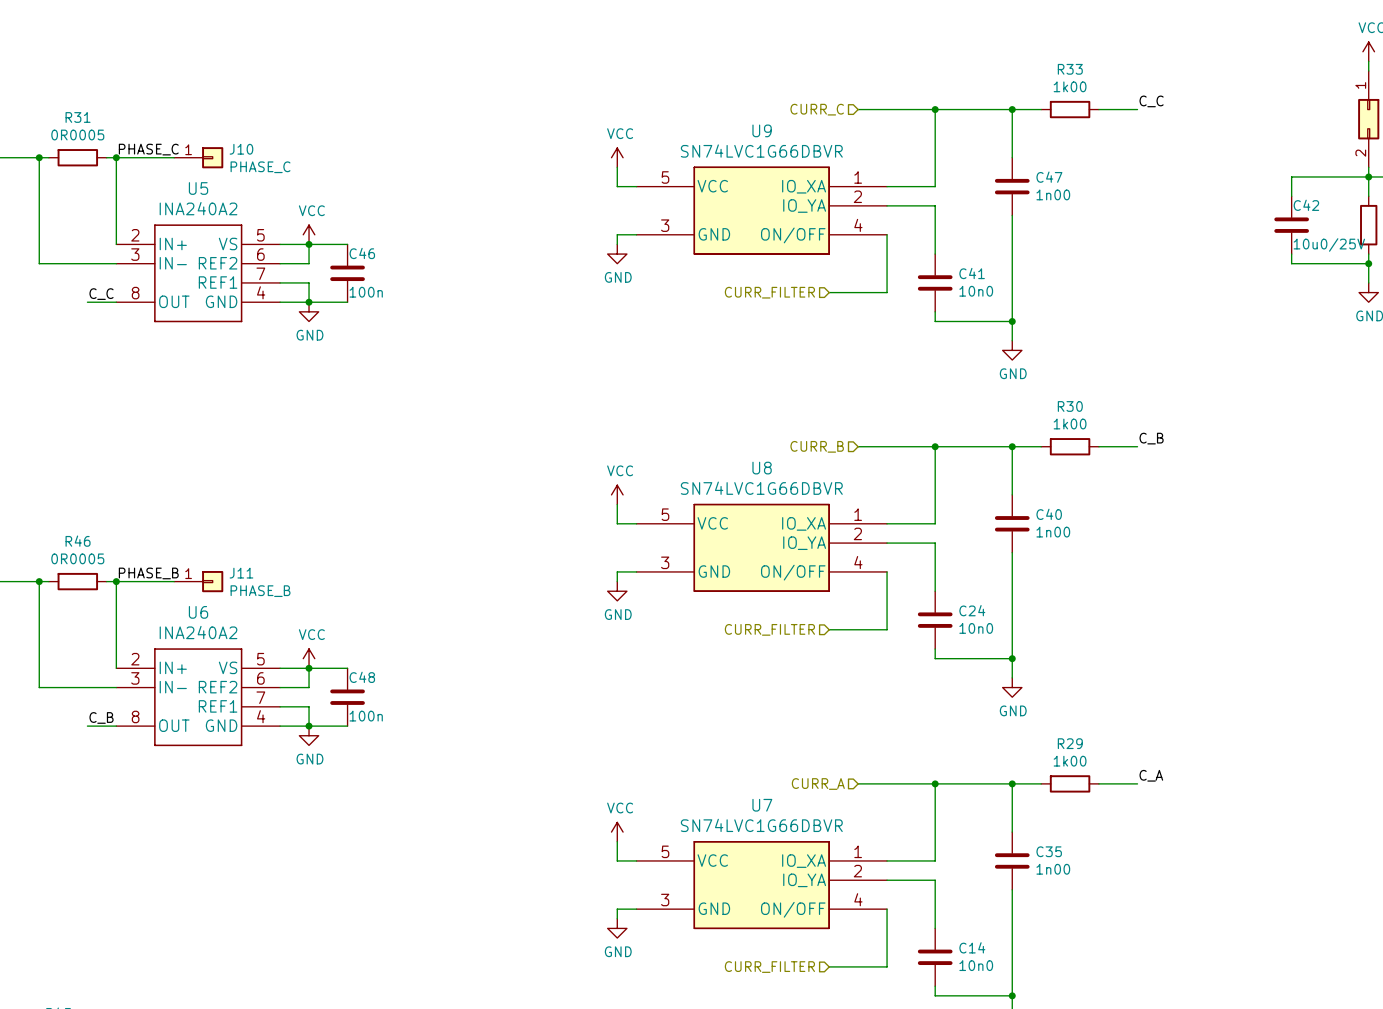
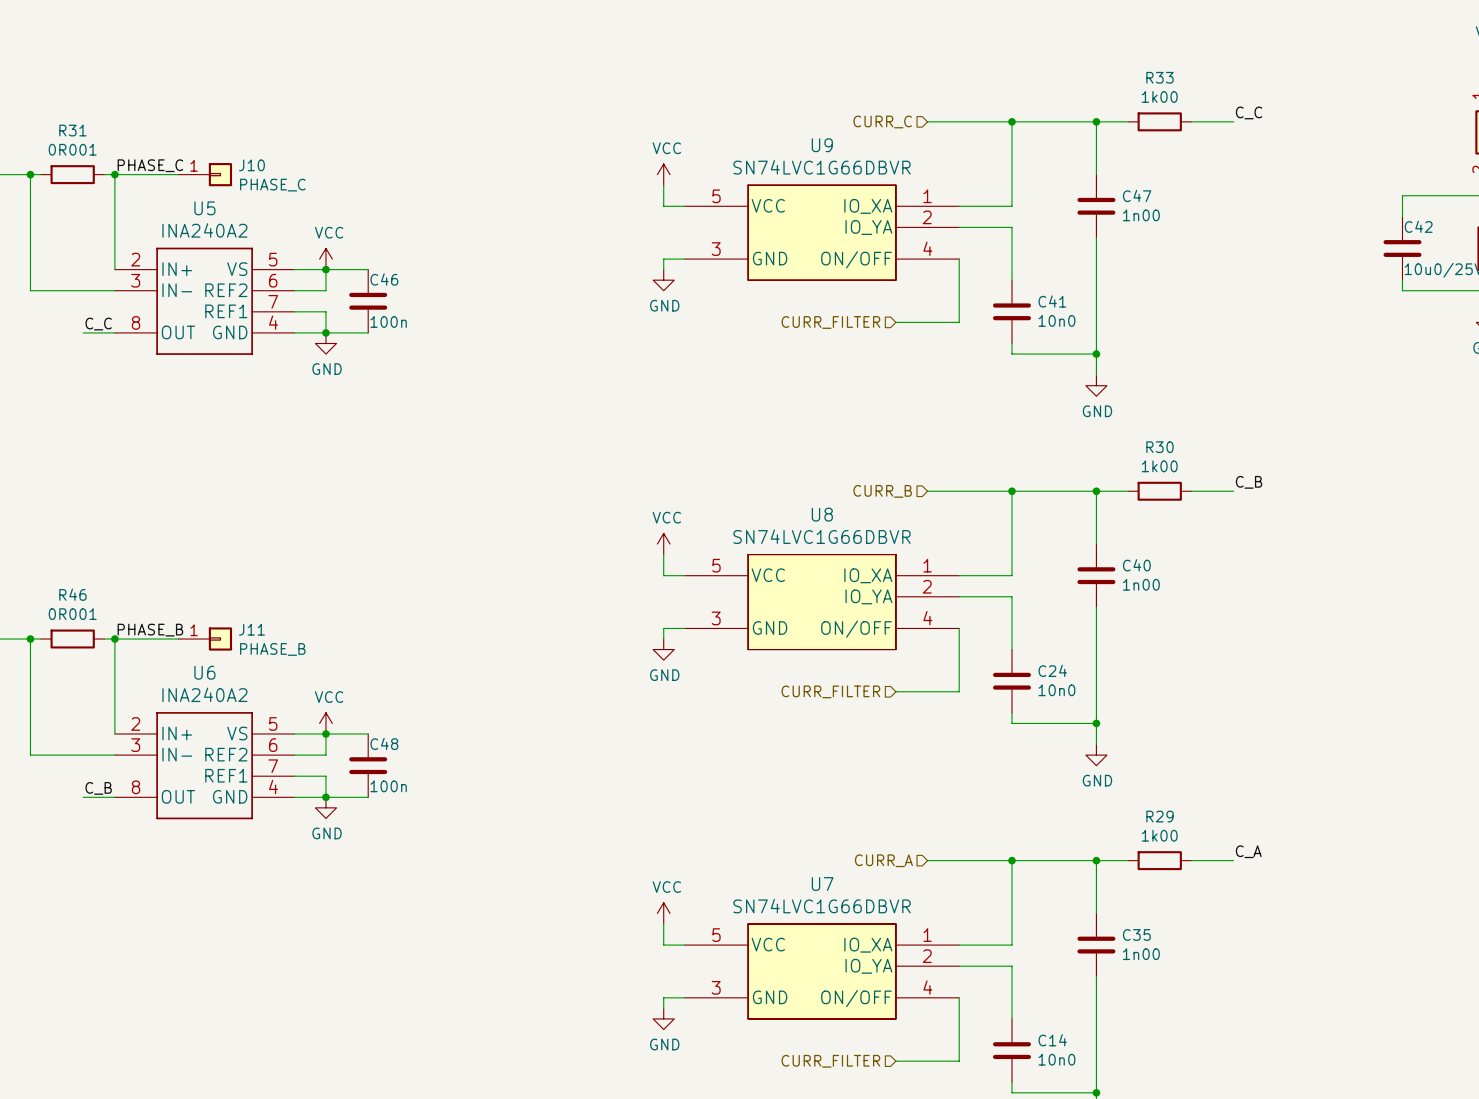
R31 value: 0R0005 (77, 135) -> 0R001 (72, 149)
R46 value: 0R0005 (77, 558) -> 0R001 (72, 614)

